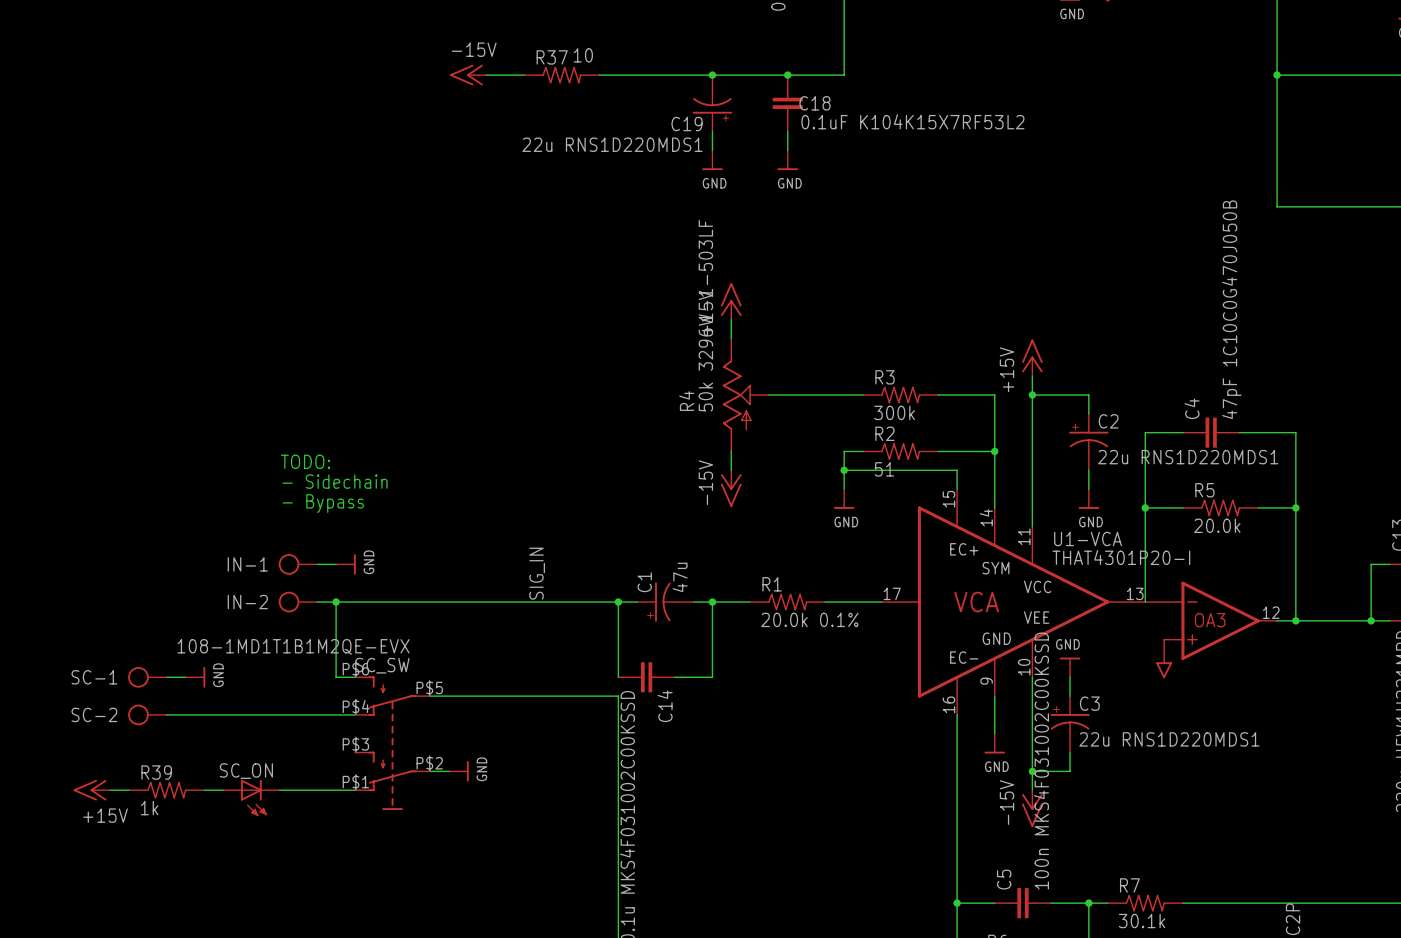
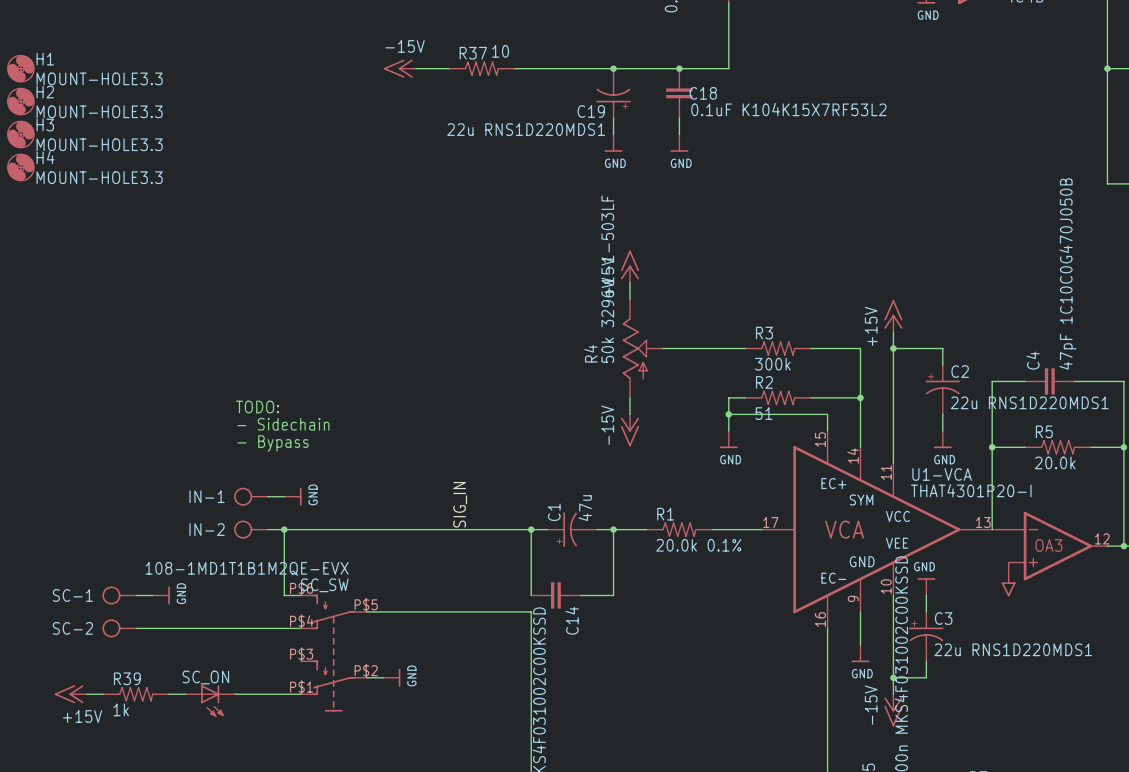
H1: none -> MOUNT-HOLE3.3 (20, 68)
H2: none -> MOUNT-HOLE3.3 (20, 101)
H3: none -> MOUNT-HOLE3.3 (20, 134)
H4: none -> MOUNT-HOLE3.3 (20, 167)

